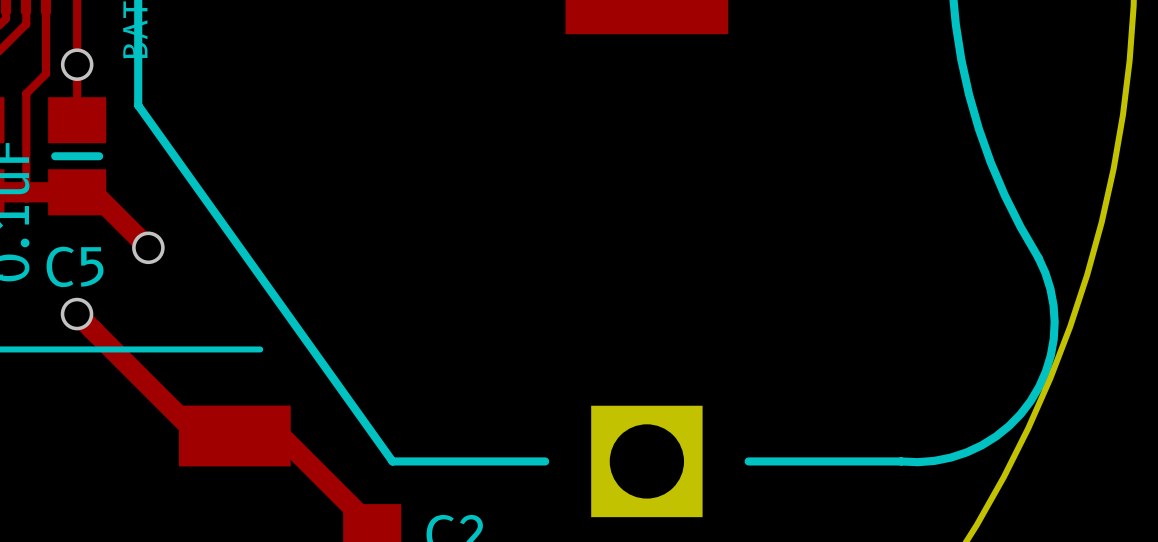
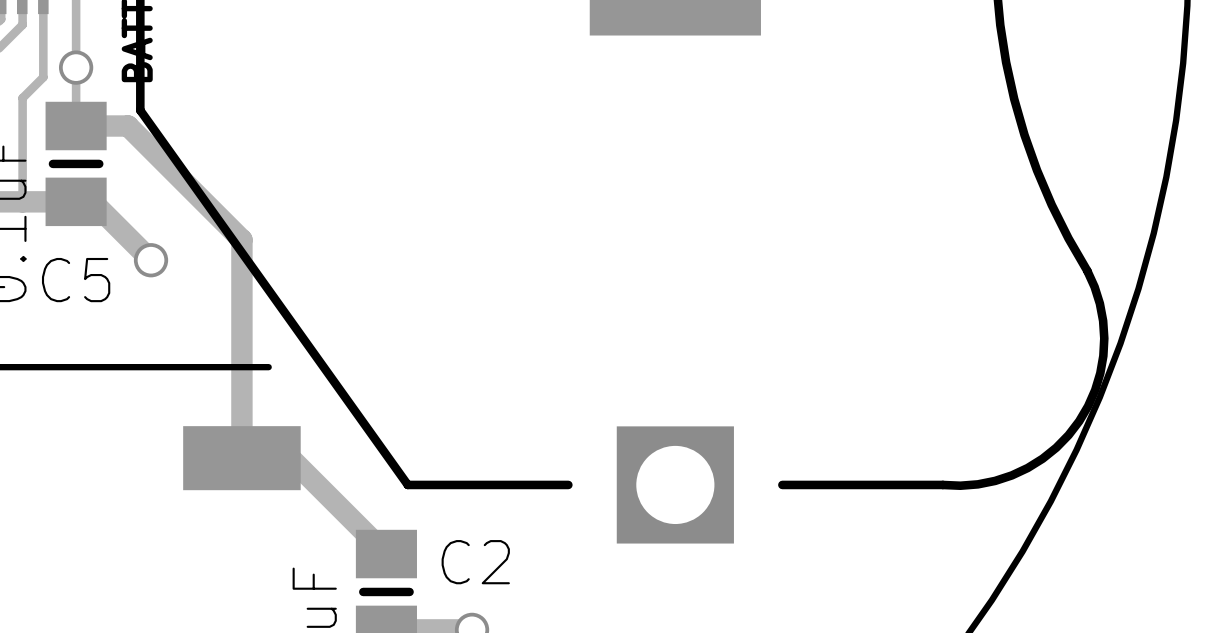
track: (77, 314) (198, 435) (234, 435) -> (76, 126) (128, 126) (241, 239) (241, 458)
via: (77, 314) -> none

